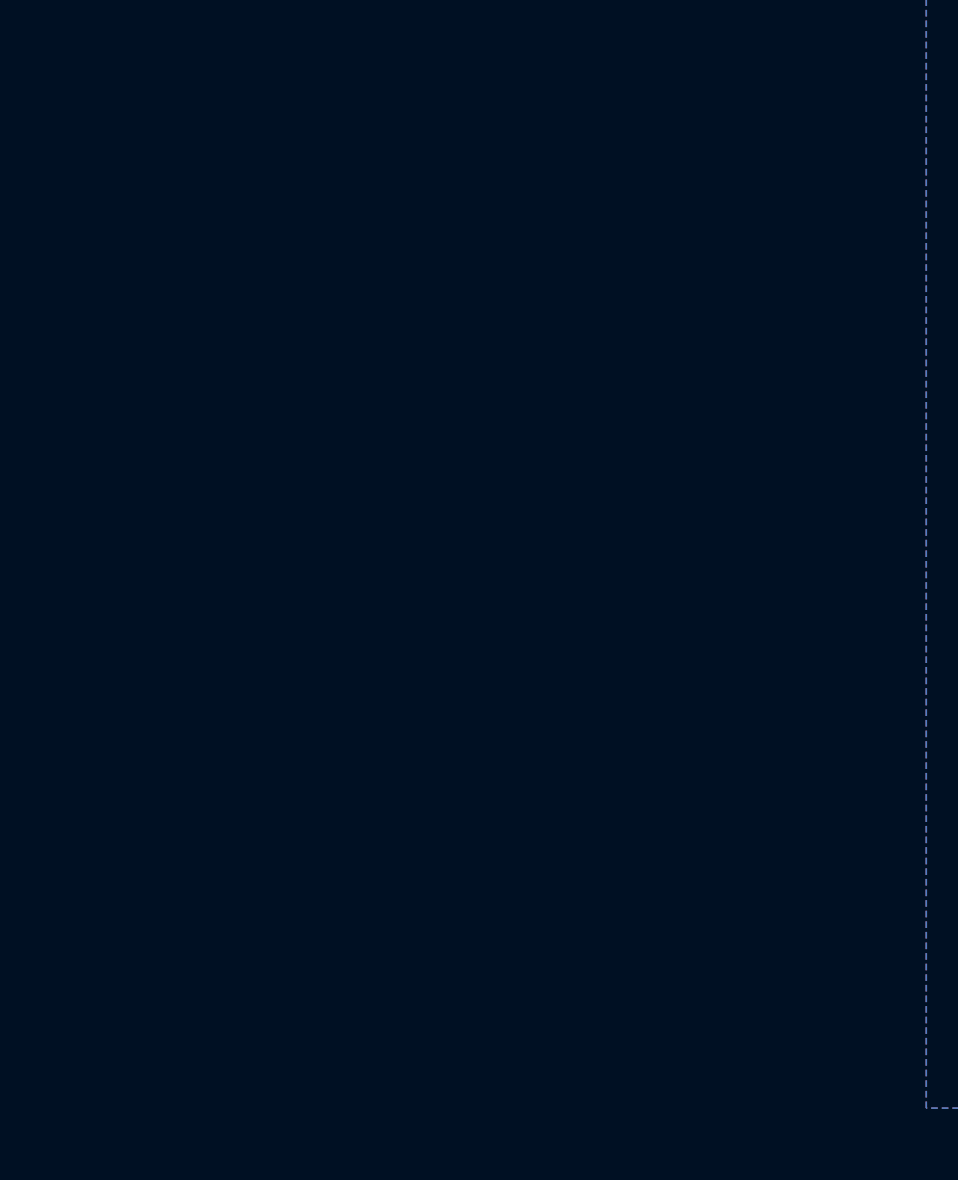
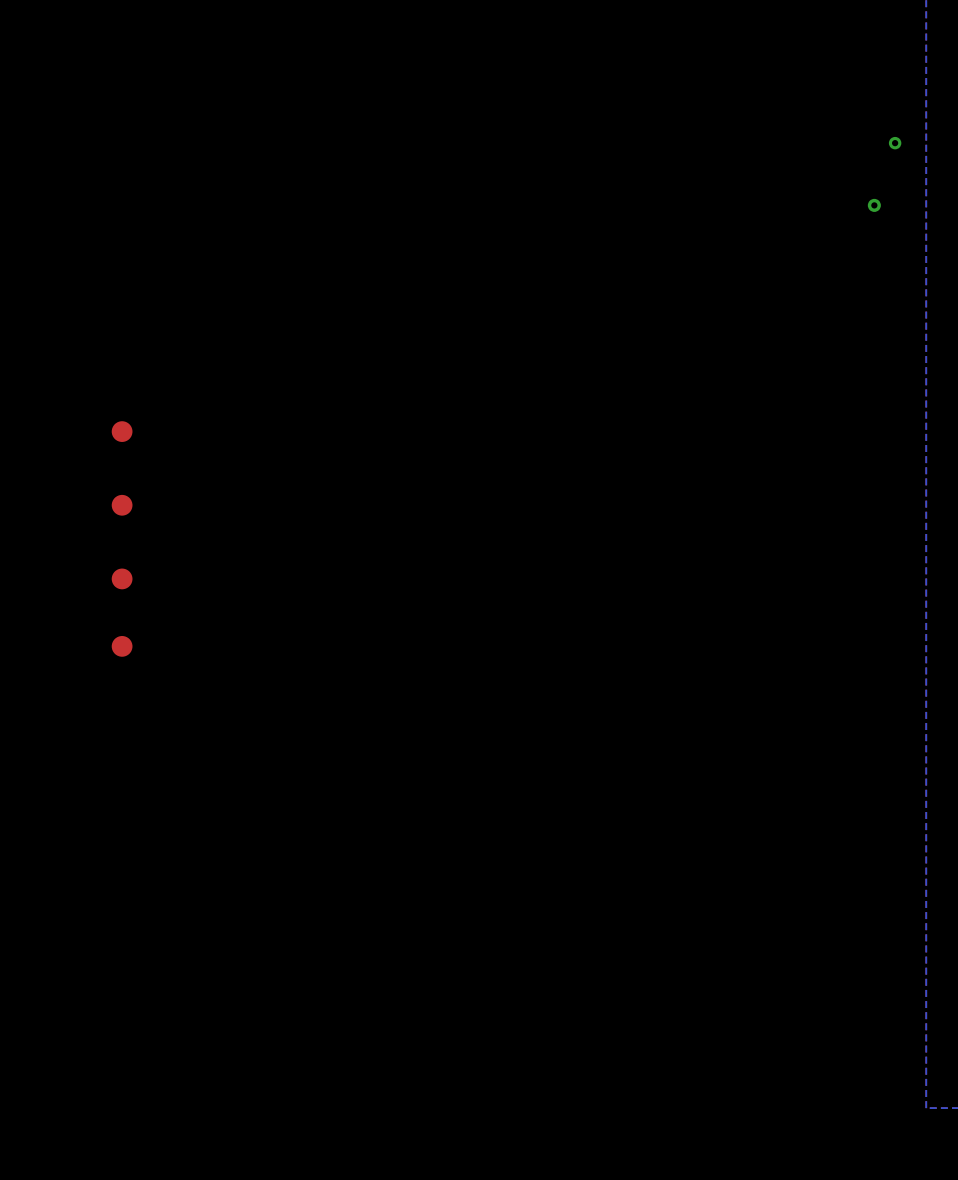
part: none -> (895, 143)
part: none -> (874, 205)
part: none -> (122, 431)
part: none -> (122, 505)
part: none -> (122, 578)
part: none -> (122, 646)

